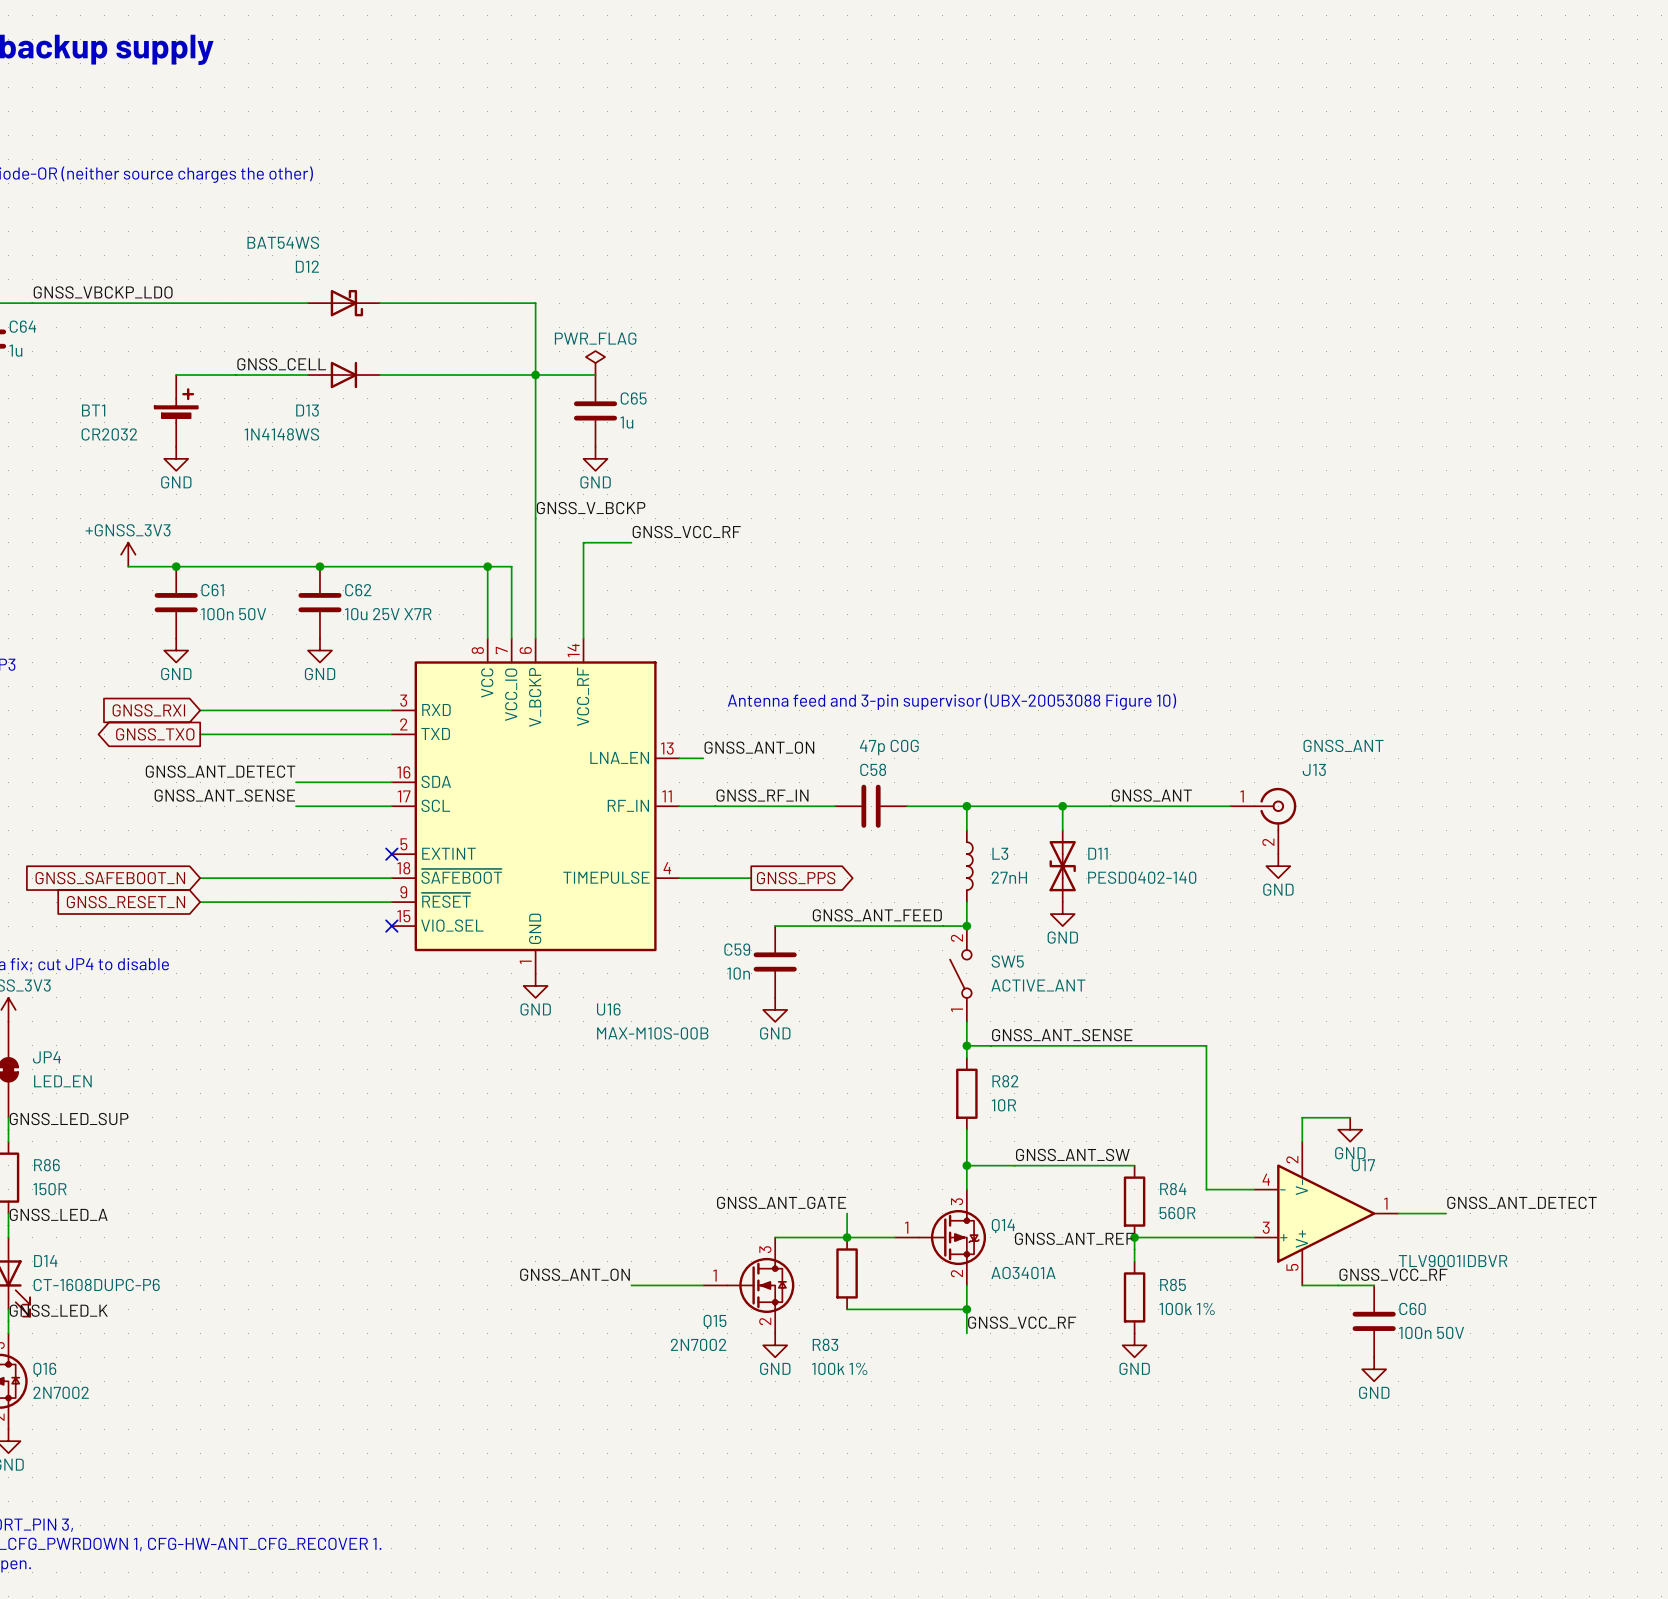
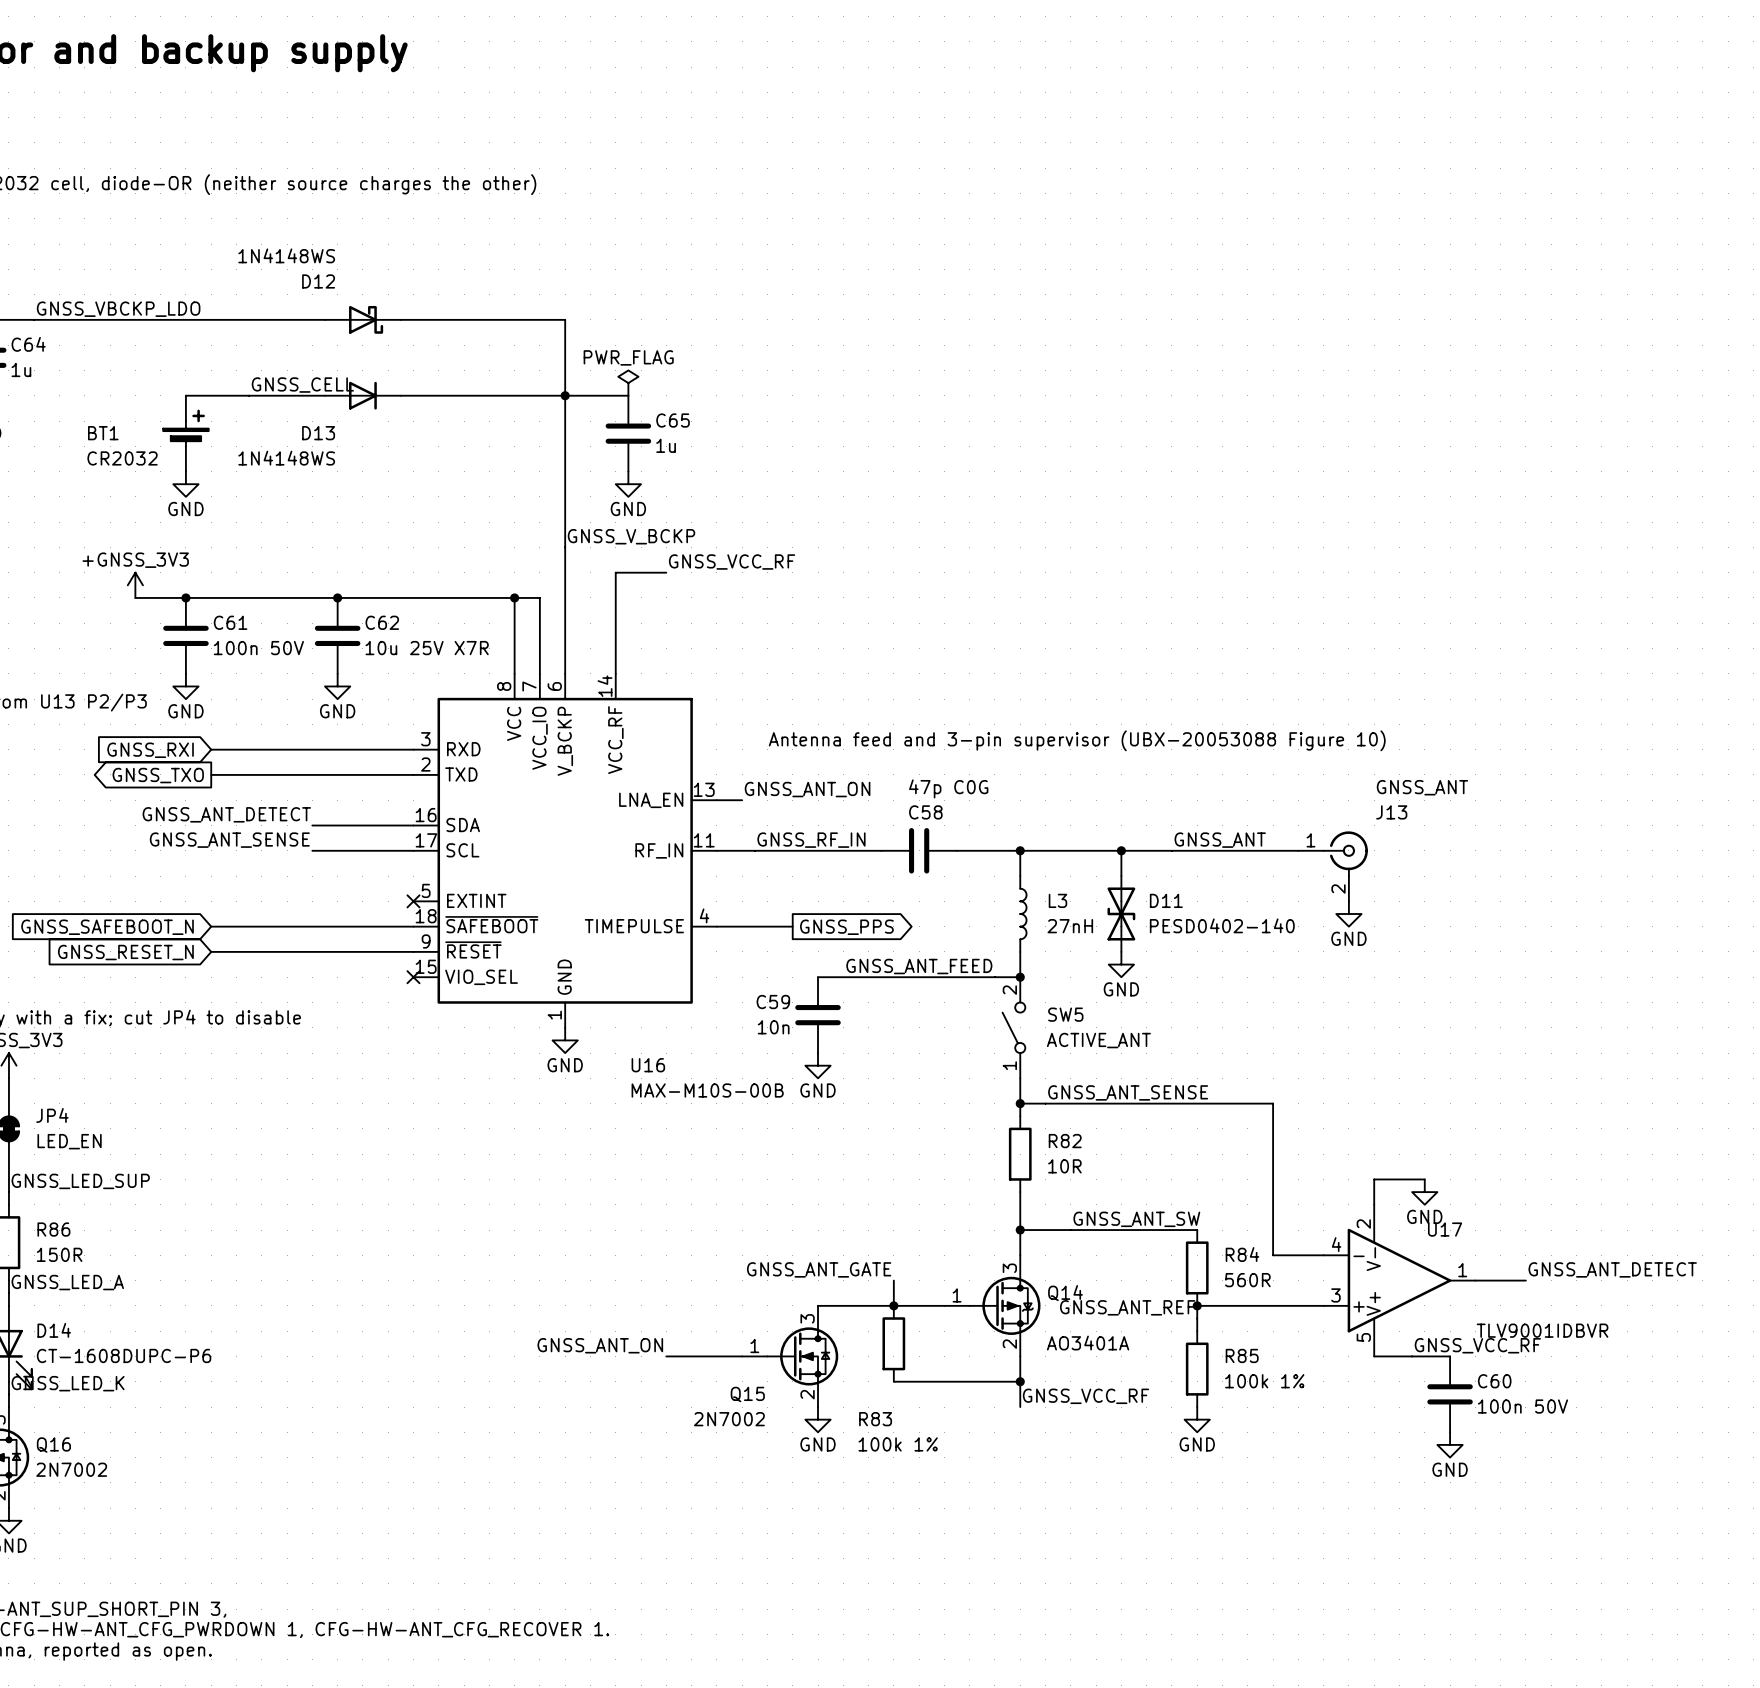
D12 value: BAT54WS (283, 242) -> 1N4148WS (286, 255)

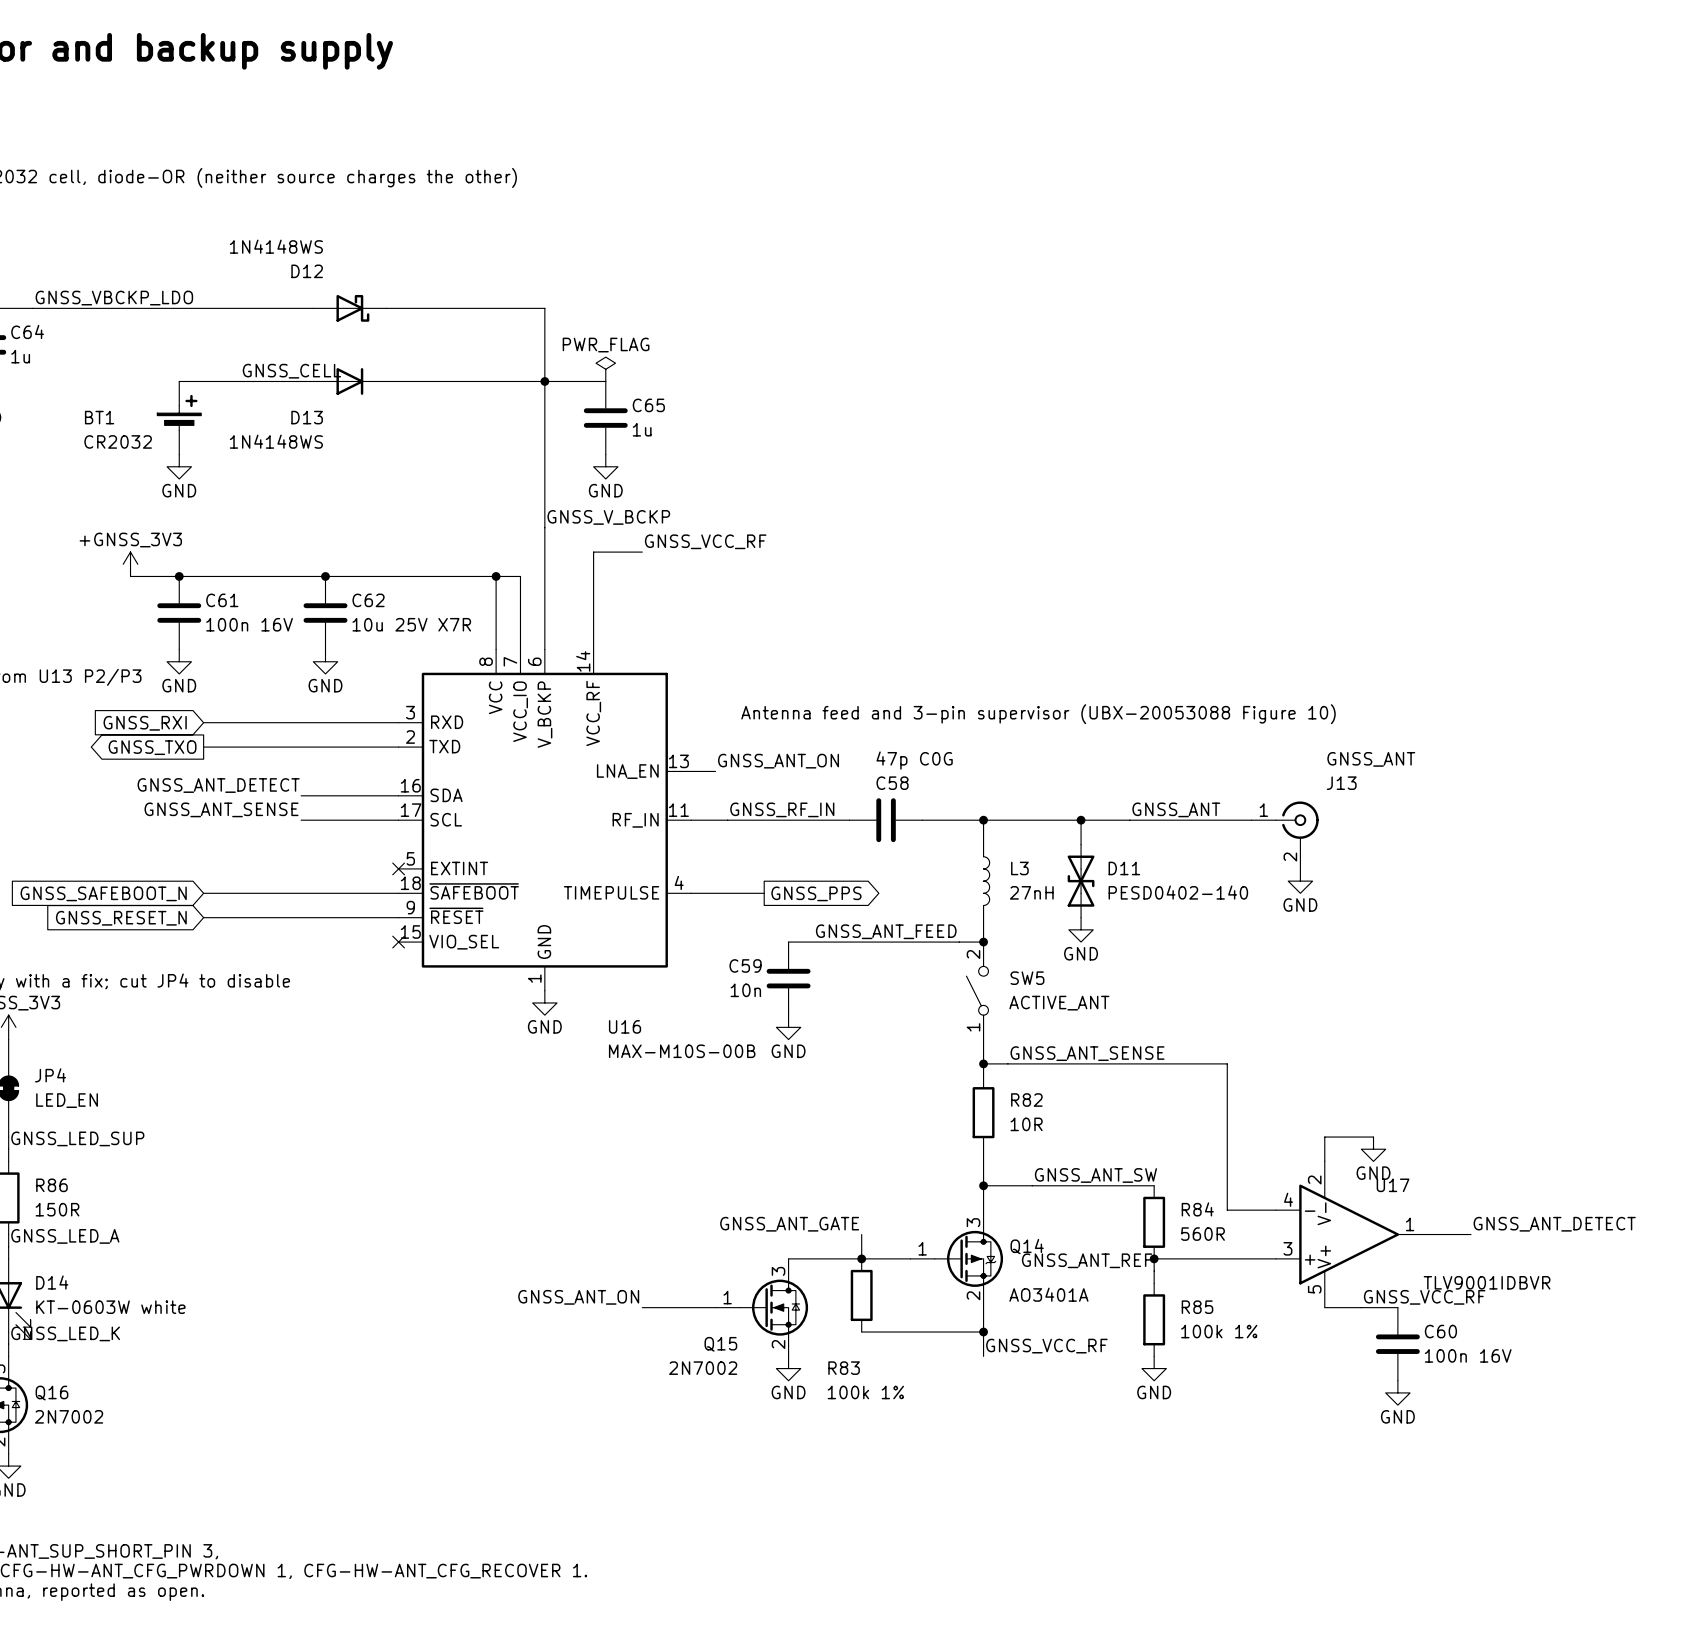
C61 value: 100n 50V (258, 648) -> 100n 16V (249, 624)
D14 value: CT-1608DUPC-P6 (124, 1355) -> KT-0603W white (110, 1307)
C60 value: 100n 50V (1522, 1406) -> 100n 16V (1468, 1355)

